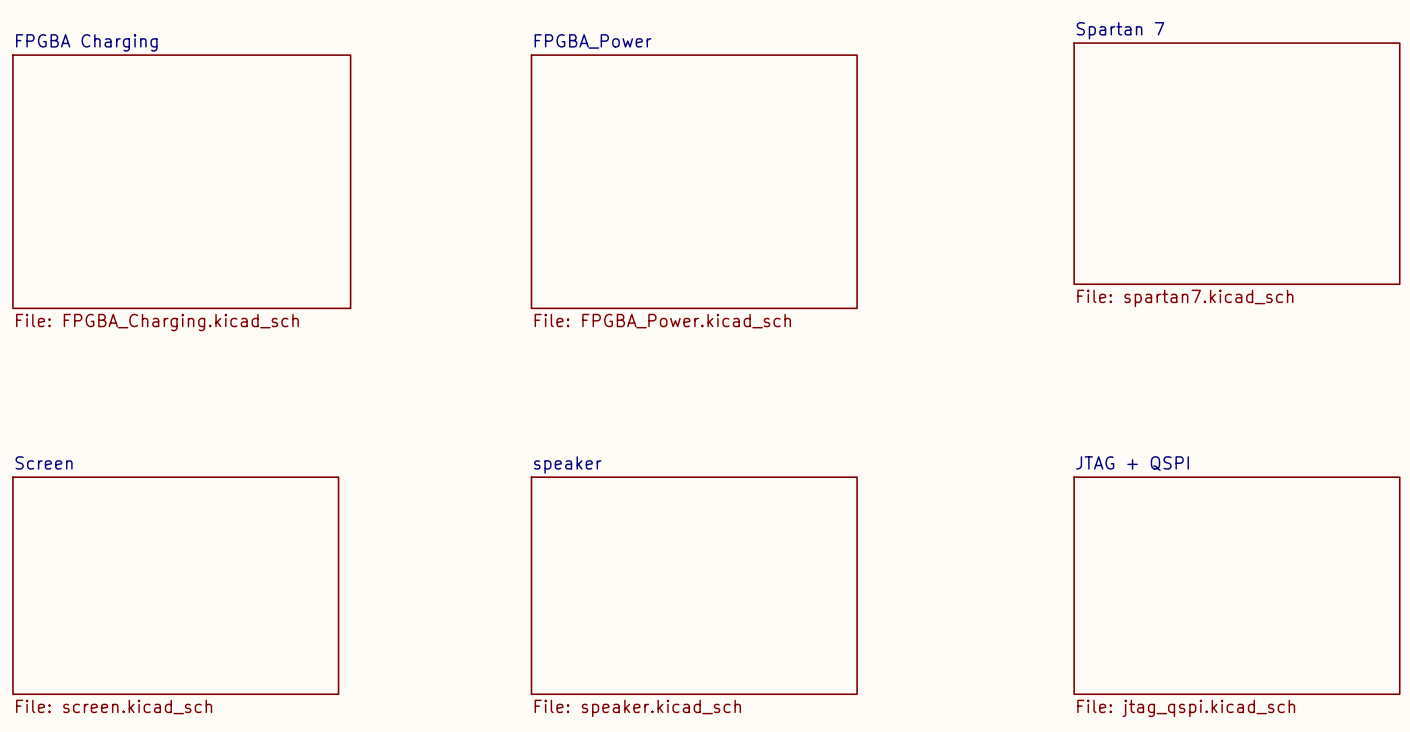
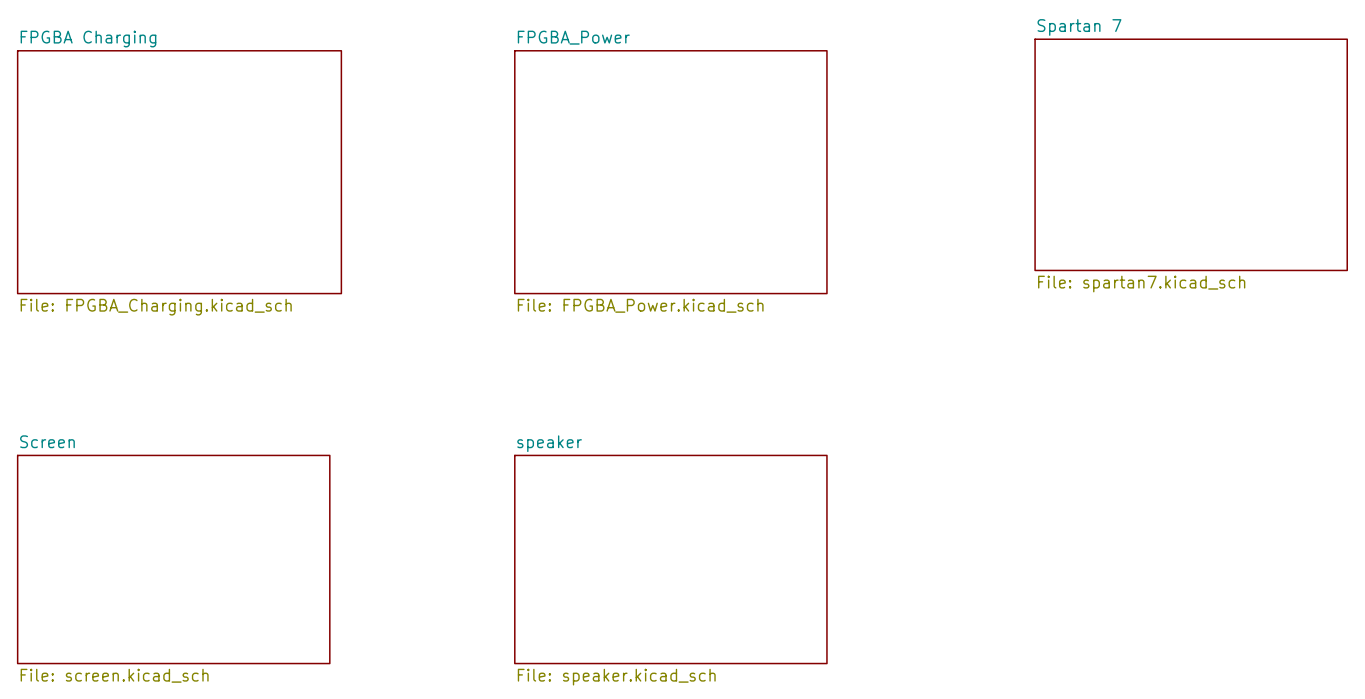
sheet JTAG + QSPI: File: jtag_qspi.kicad_sch (1236, 585) -> none

